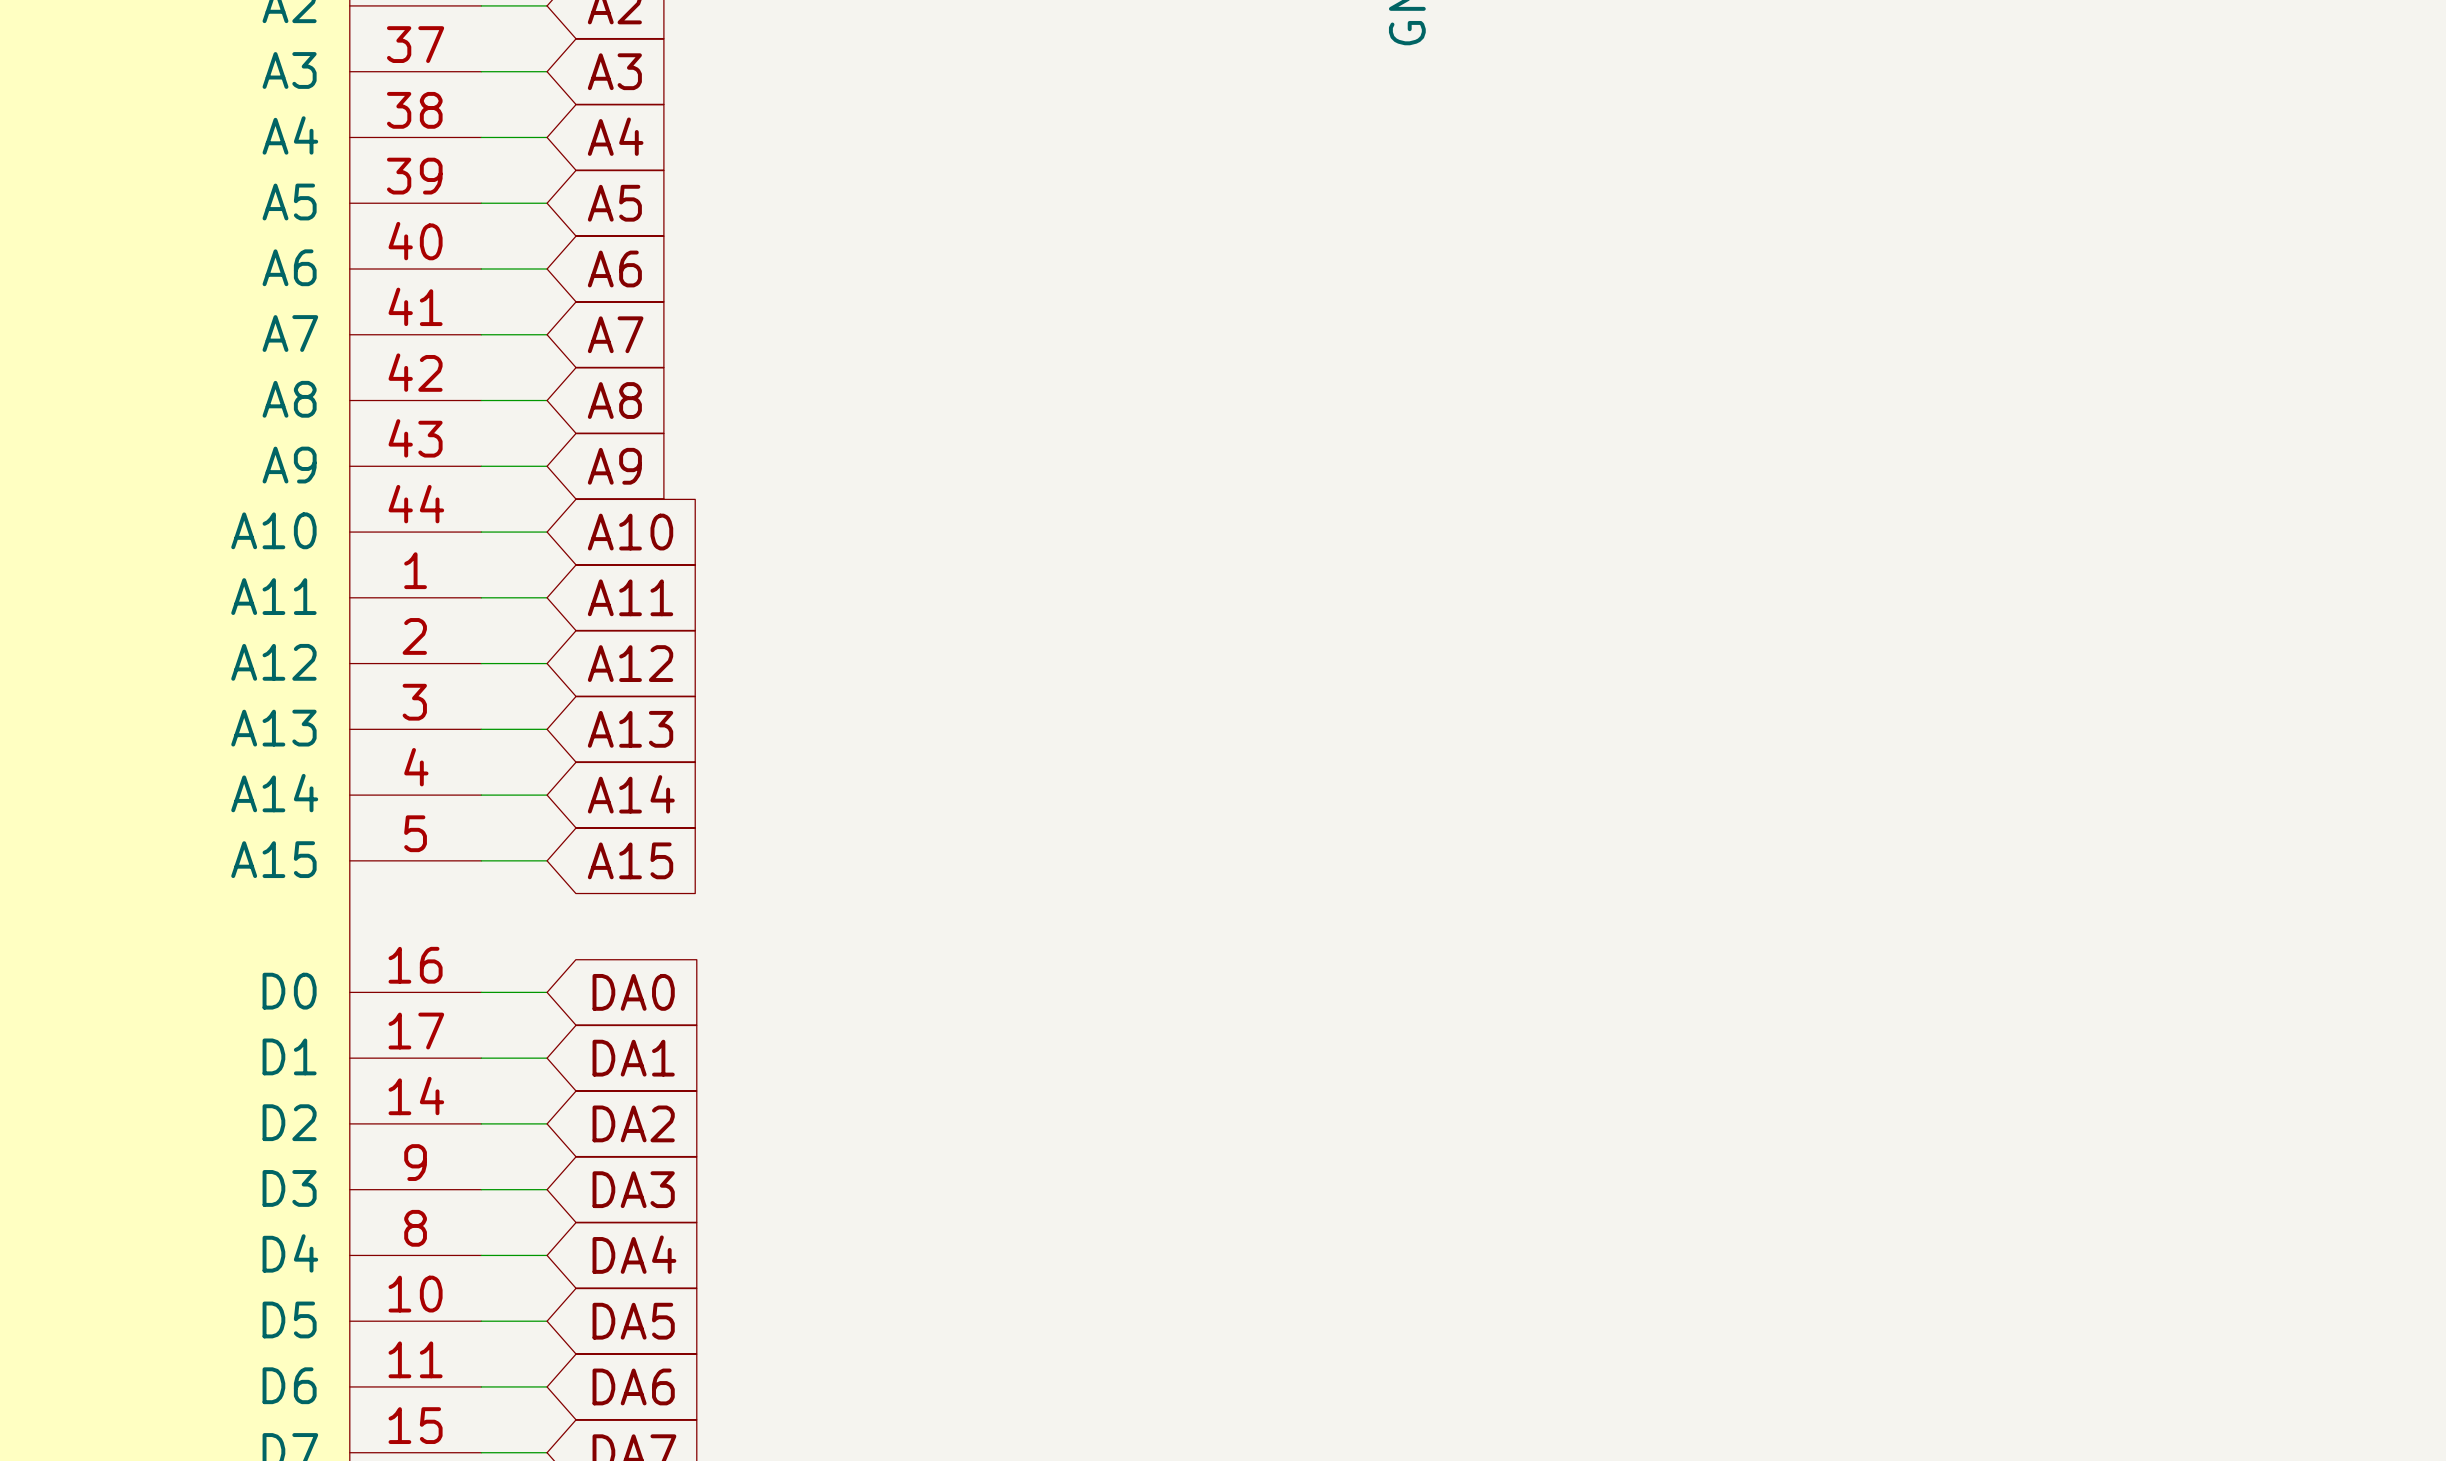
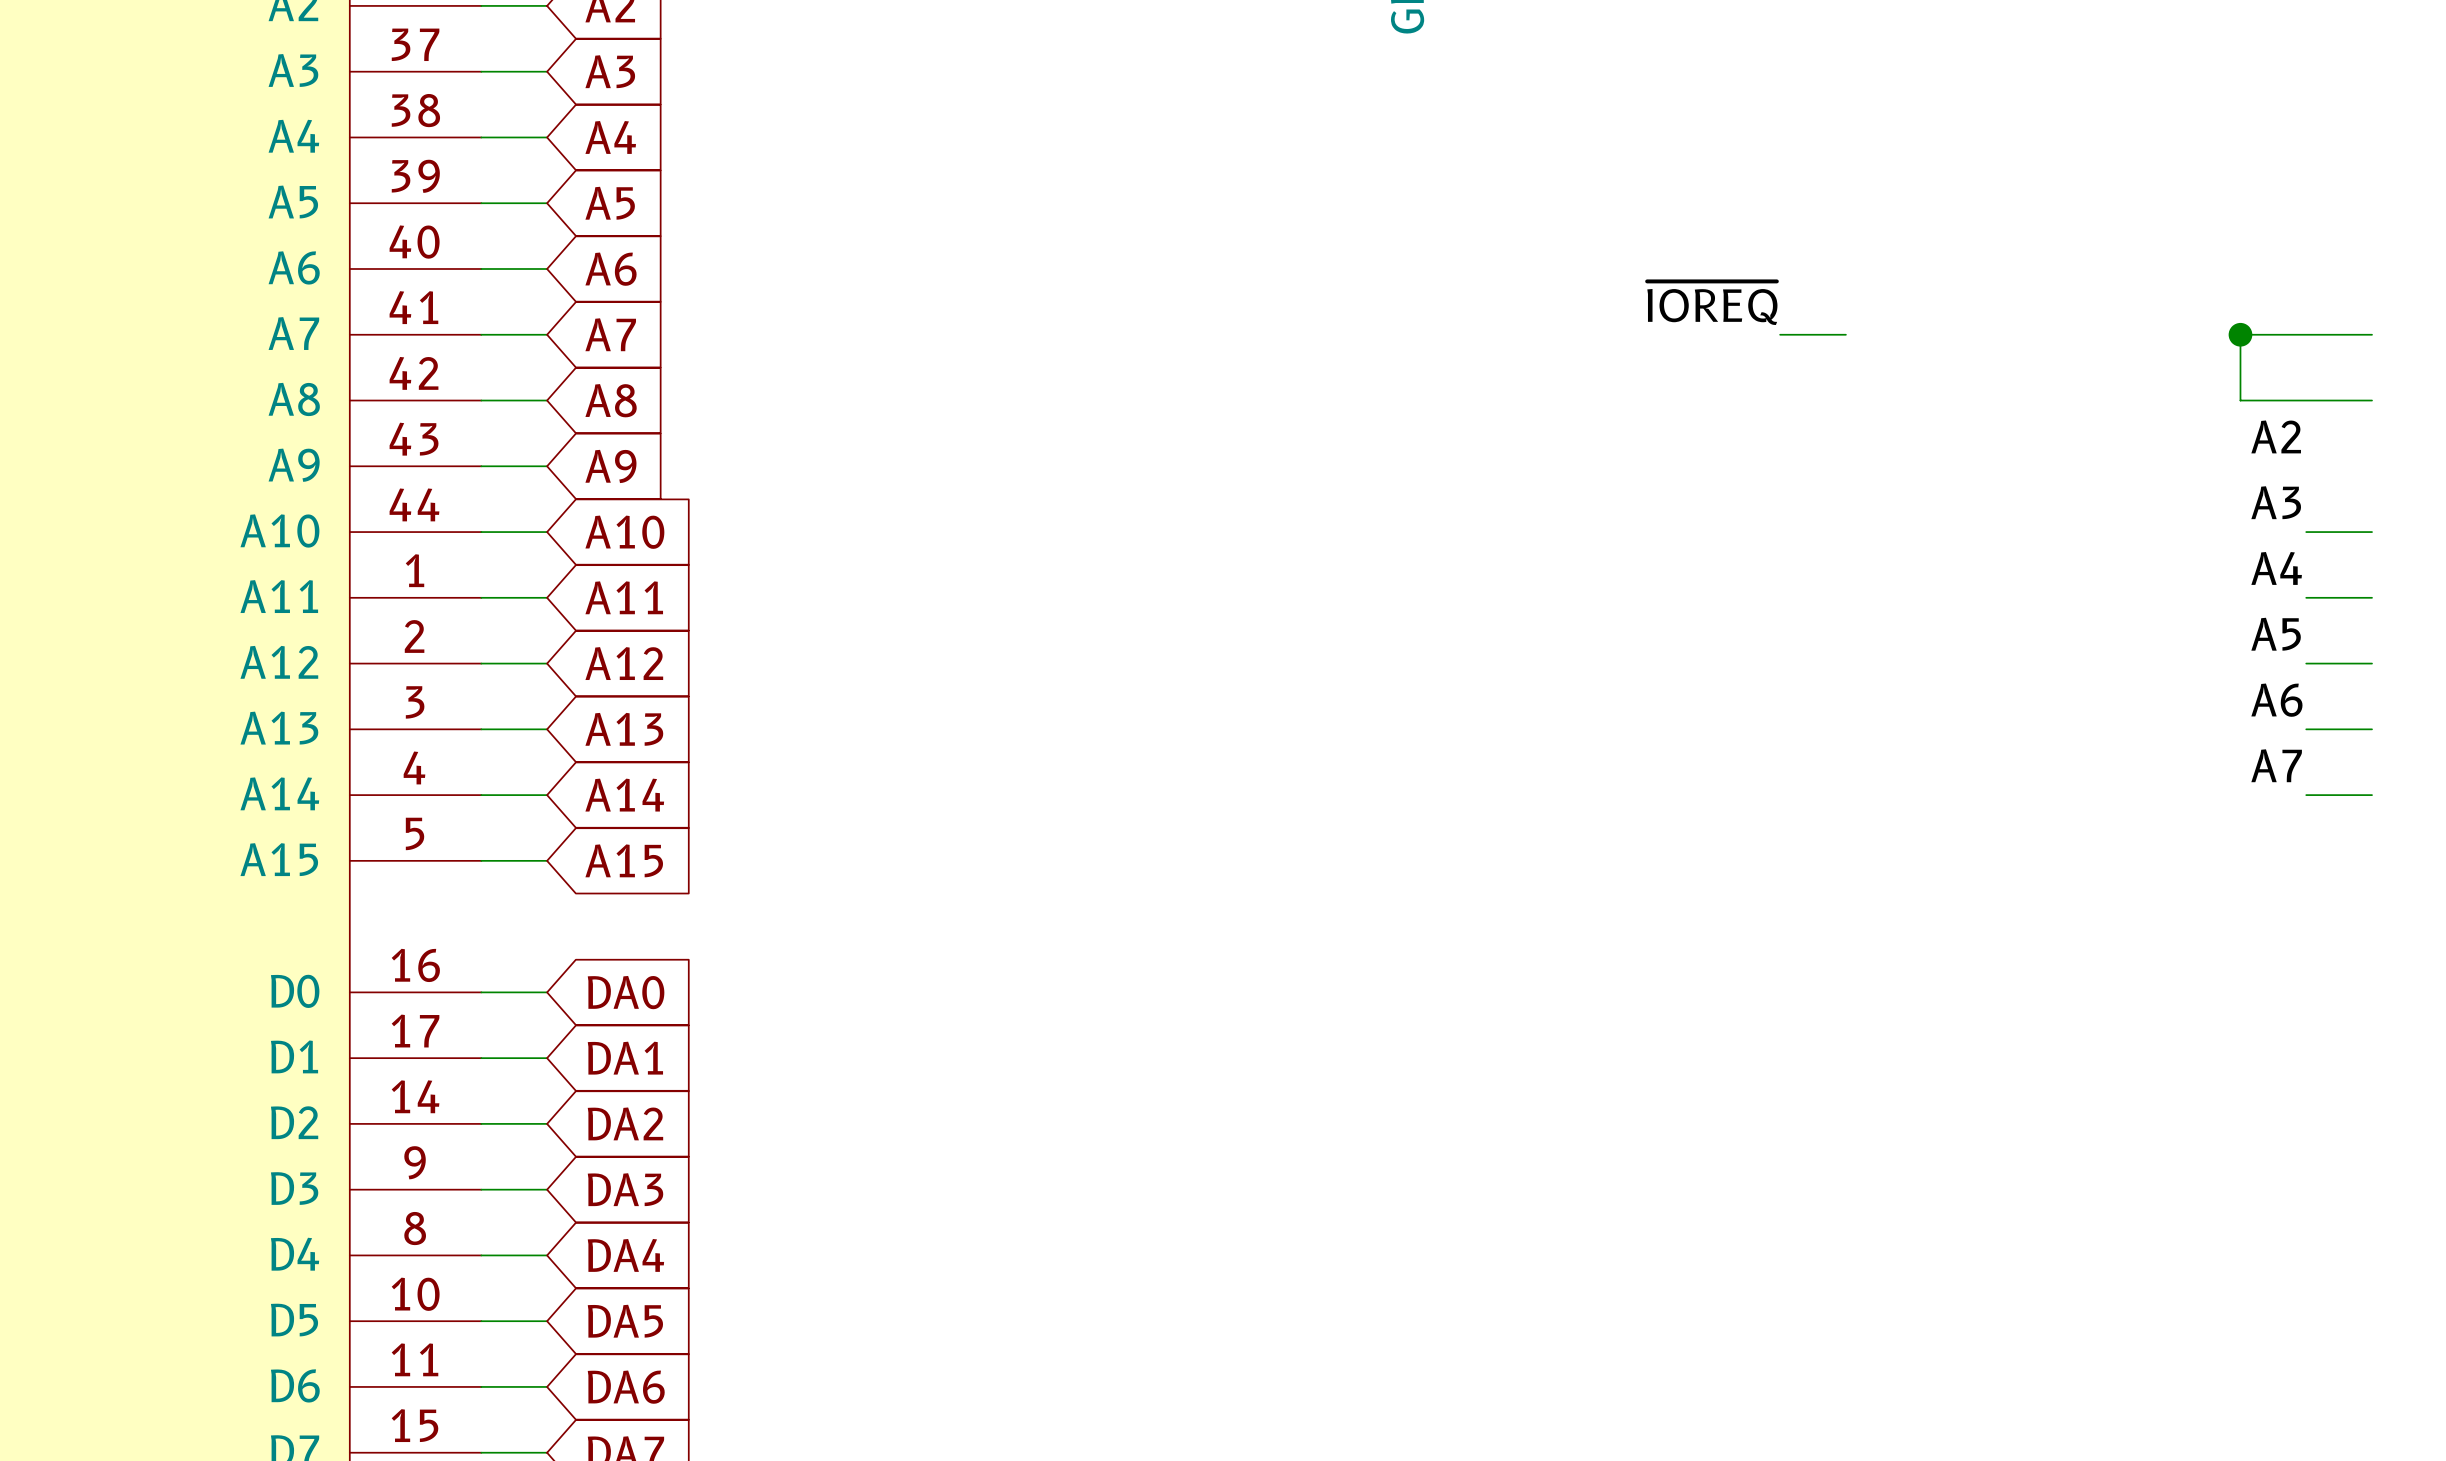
label: none -> ~{IOREQ} (1712, 303)
wire: none -> (1780, 334) (1845, 334)
junction: none -> (2240, 334)
wire: none -> (2372, 334) (2240, 334) (2240, 400) (2372, 400)
label: none -> A2 (2276, 436)
label: none -> A3 (2276, 502)
wire: none -> (2306, 532) (2372, 532)
label: none -> A4 (2276, 568)
wire: none -> (2306, 597) (2372, 597)
label: none -> A5 (2276, 634)
wire: none -> (2306, 663) (2372, 663)
label: none -> A6 (2276, 700)
wire: none -> (2306, 729) (2372, 729)
label: none -> A7 (2276, 765)
wire: none -> (2306, 795) (2372, 795)

